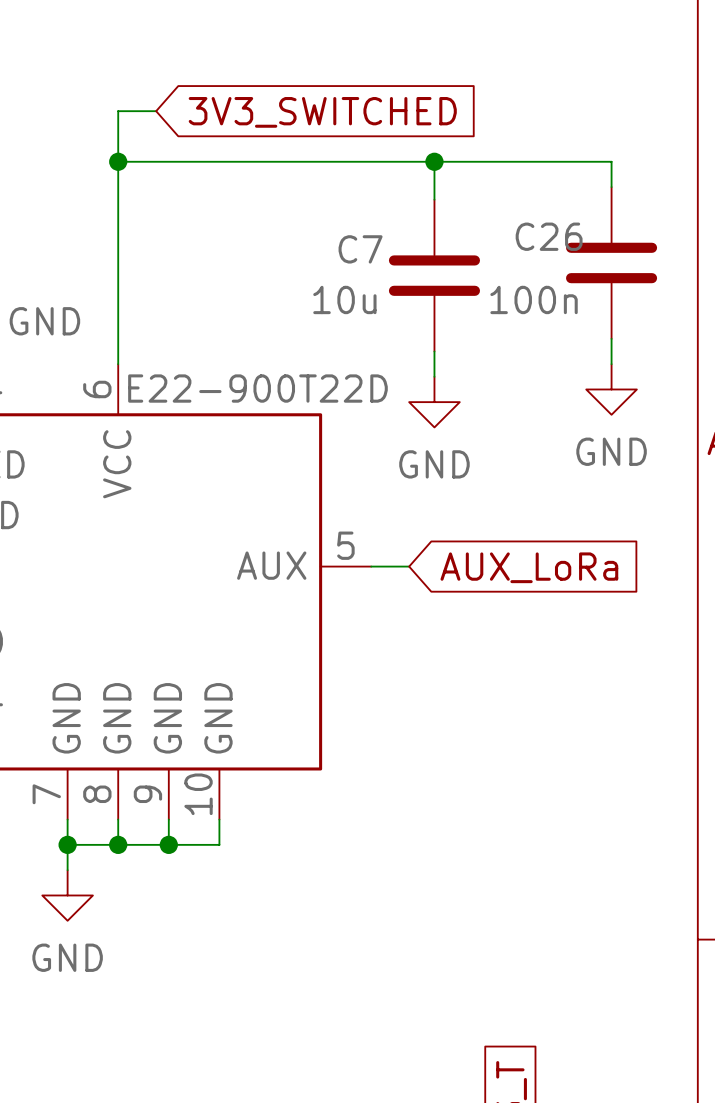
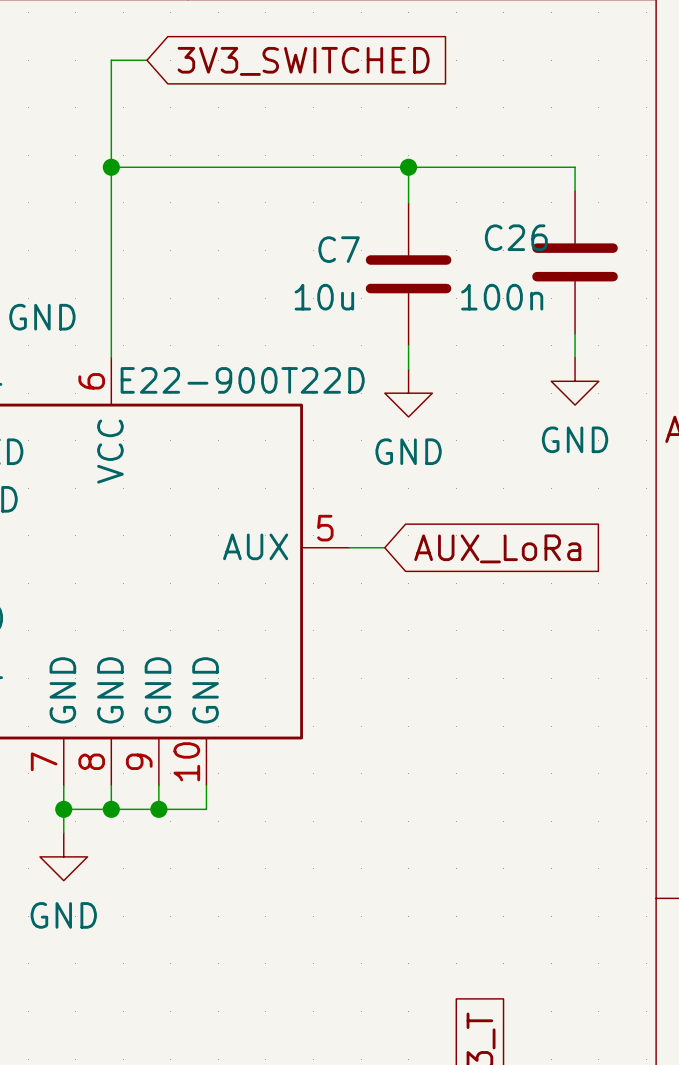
wire: (118, 111) (156, 111) -> (111, 119) (111, 60) (146, 60)
global label position: 3V3_SWITCHED (322, 112) -> 3V3_SWITCHED (303, 61)

